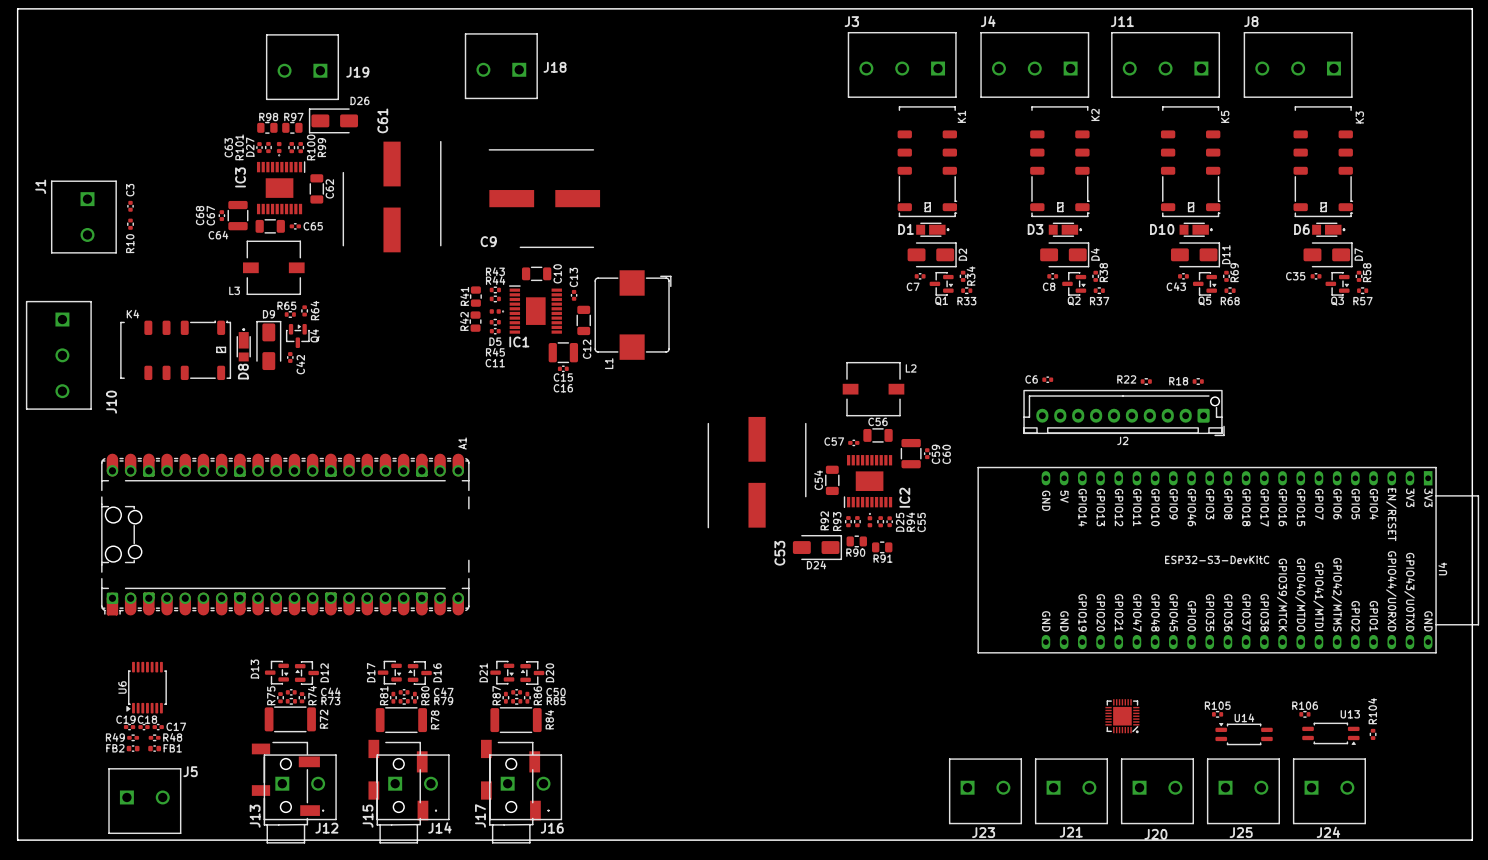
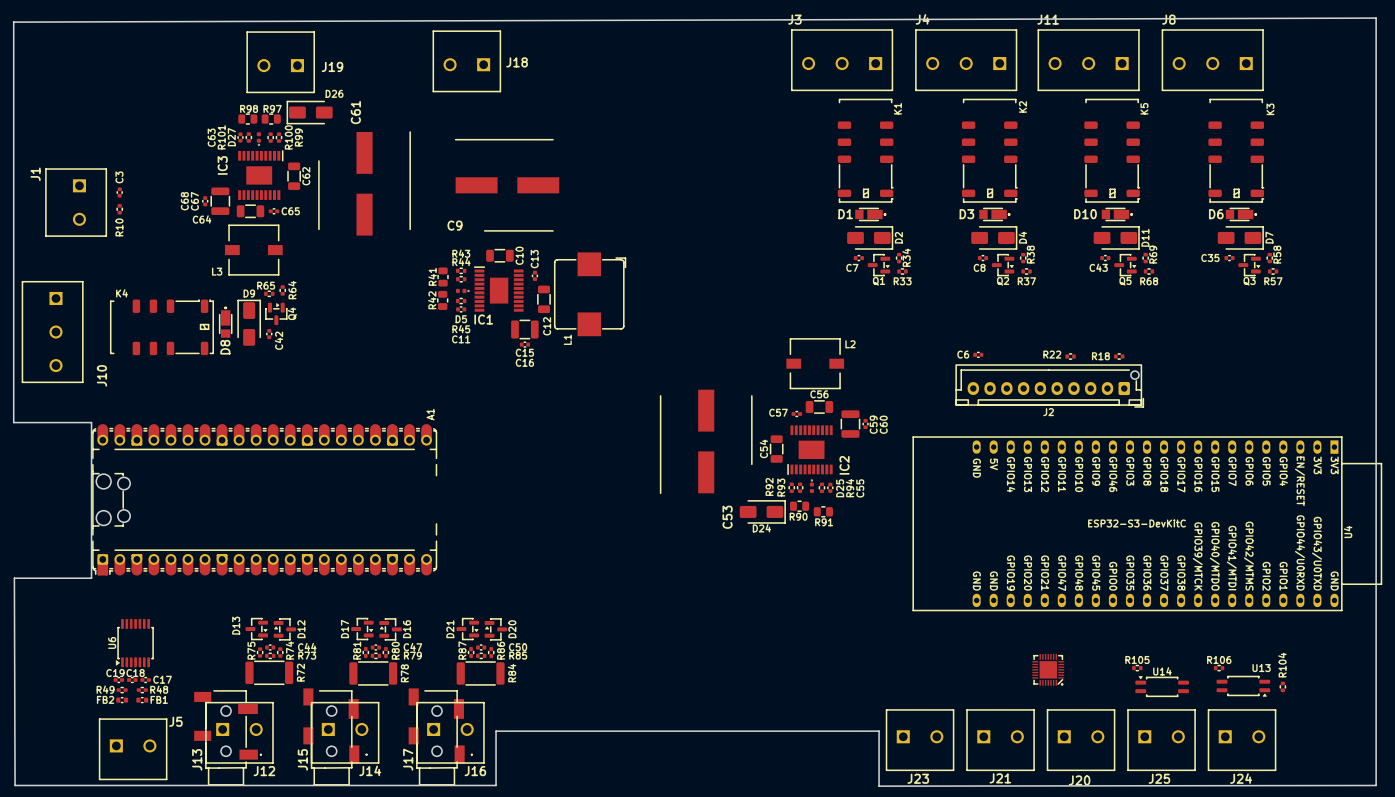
board edge: (17, 8) (1472, 8) (1472, 840) (17, 840) (17, 8) -> (1376, 18) (13, 22) (13, 422) (91, 422) (91, 578) (14, 578) (15, 785) (496, 785) (496, 731) (879, 731) (879, 786) (1376, 785) (1376, 18)
J12 position: (300, 787) -> (239, 732)
J14 position: (413, 787) -> (345, 732)
J16 position: (525, 787) -> (450, 732)
J15 position: (402, 791) -> (335, 736)
J17 position: (515, 791) -> (440, 736)
J13 position: (288, 792) -> (228, 737)

